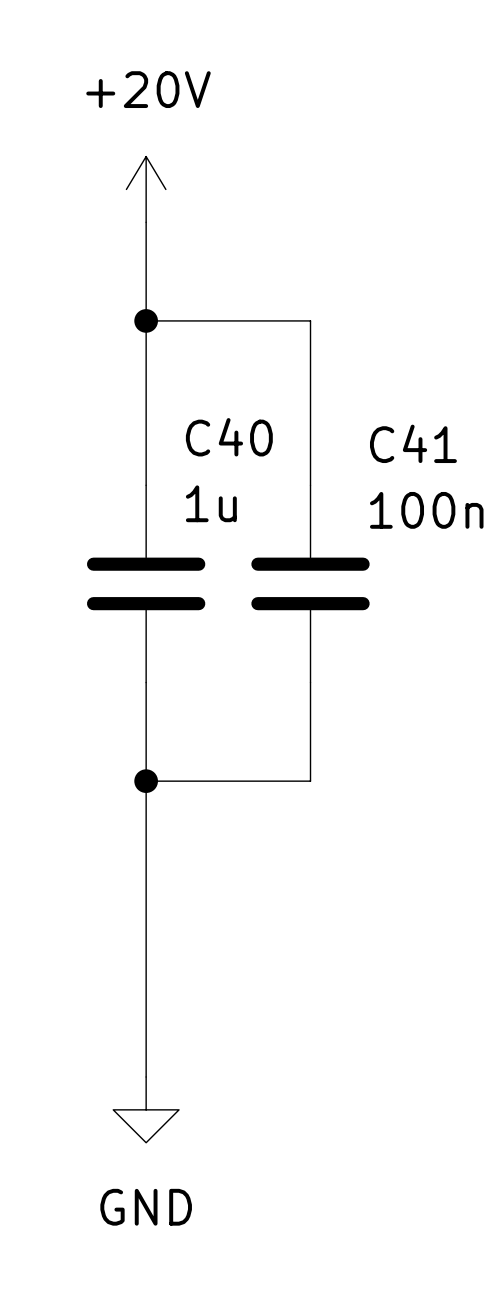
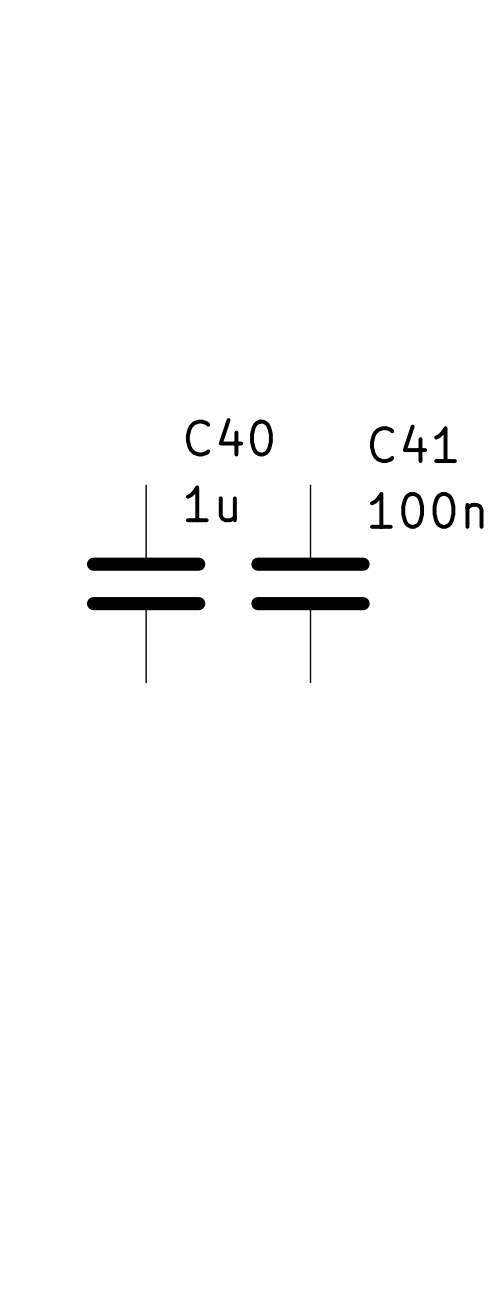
power symbol: +20V (146, 189) -> none
wire: (146, 222) (146, 485) -> none
wire: (146, 320) (310, 320) (310, 485) -> none
junction: (146, 320) -> none
wire: (146, 682) (146, 1076) -> none
wire: (310, 682) (310, 781) (146, 781) -> none
junction: (146, 781) -> none
power symbol: GND (146, 1109) -> none

